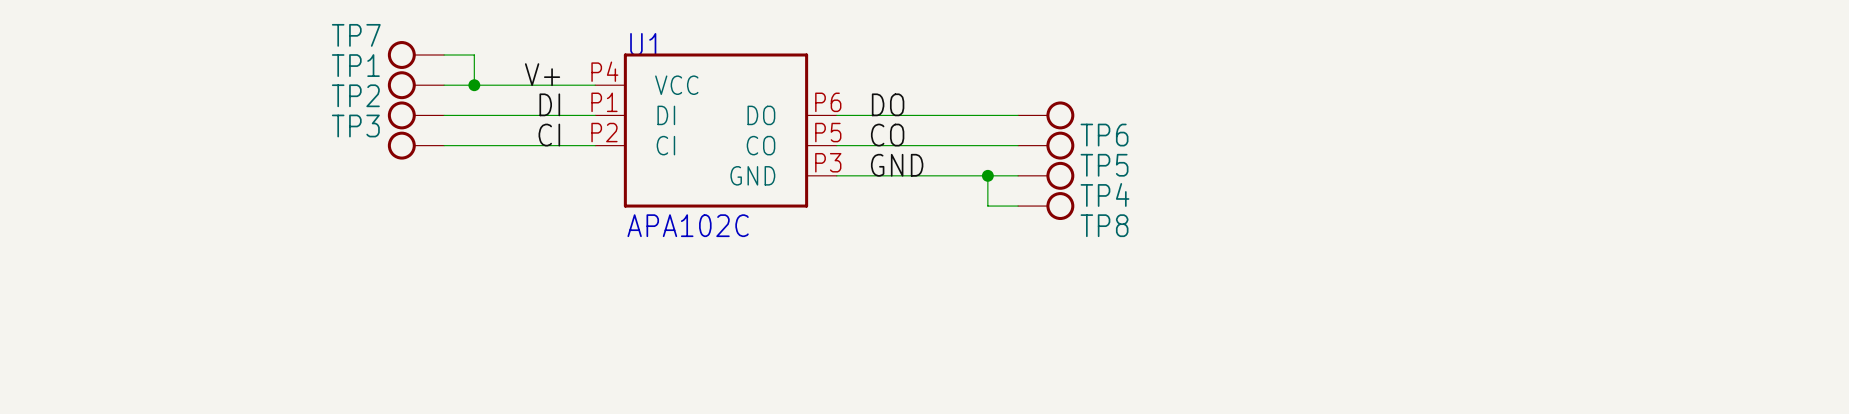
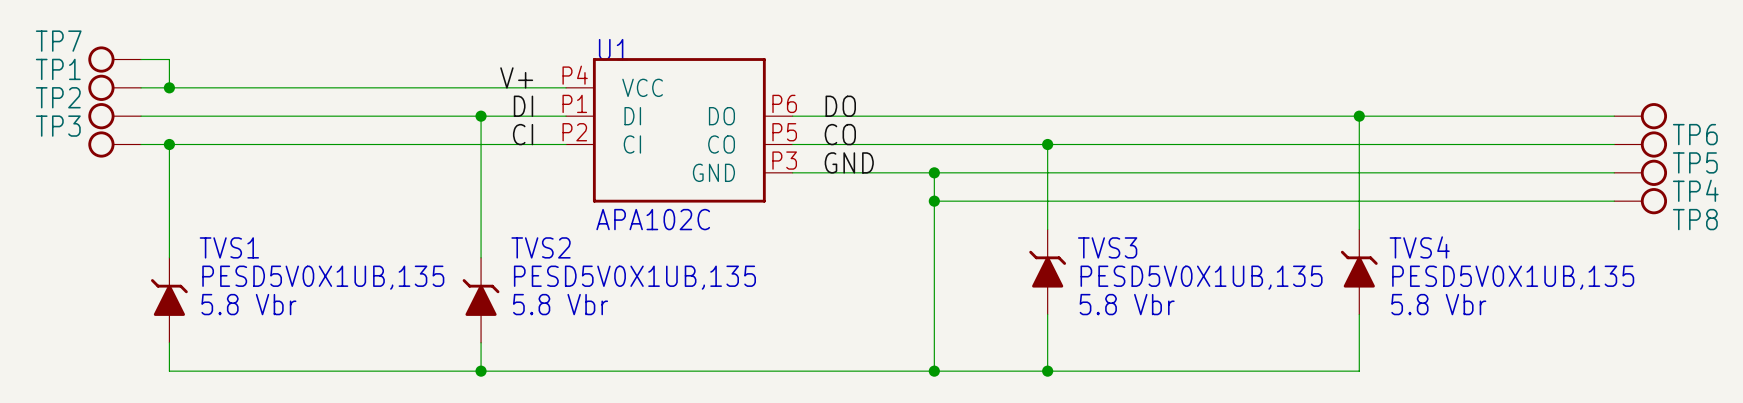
wire: none -> (141, 59) (169, 59) (169, 87)
TP7 position: (415, 55) -> (114, 59)
wire: (444, 55) (474, 55) (474, 85) -> none
wire: none -> (141, 87) (424, 87)
junction: none -> (169, 87)
TP1 position: (415, 85) -> (114, 87)
junction position: (474, 85) -> (481, 116)
wire: none -> (141, 116) (424, 116)
TP2 position: (415, 115) -> (114, 116)
wire: none -> (481, 116) (481, 257)
wire: none -> (962, 116) (1614, 116)
TP6 position: (1046, 115) -> (1640, 116)
wire: none -> (1359, 116) (1359, 229)
junction: none -> (1359, 116)
wire: none -> (141, 144) (424, 144)
wire: none -> (169, 144) (169, 257)
junction: none -> (169, 144)
TP3 position: (415, 145) -> (114, 144)
wire: none -> (962, 144) (1614, 144)
TP5 position: (1046, 145) -> (1640, 144)
wire: none -> (1047, 144) (1047, 229)
junction: none -> (1047, 144)
wire: none -> (962, 172) (1614, 172)
TP4 position: (1046, 175) -> (1640, 172)
wire: none -> (934, 201) (934, 371)
junction: none -> (934, 201)
wire: none -> (962, 201) (1614, 201)
TP8 position: (1046, 206) -> (1640, 201)
TVS3: none -> (1047, 271)
TVS4: none -> (1359, 271)
TVS1: none -> (169, 300)
TVS2: none -> (481, 300)
wire: none -> (1047, 314) (1047, 371)
wire: none -> (1359, 314) (1359, 371) (169, 371) (169, 342)
wire: none -> (481, 342) (481, 371)
junction: none -> (481, 371)
junction: none -> (934, 371)
junction: none -> (1047, 371)

